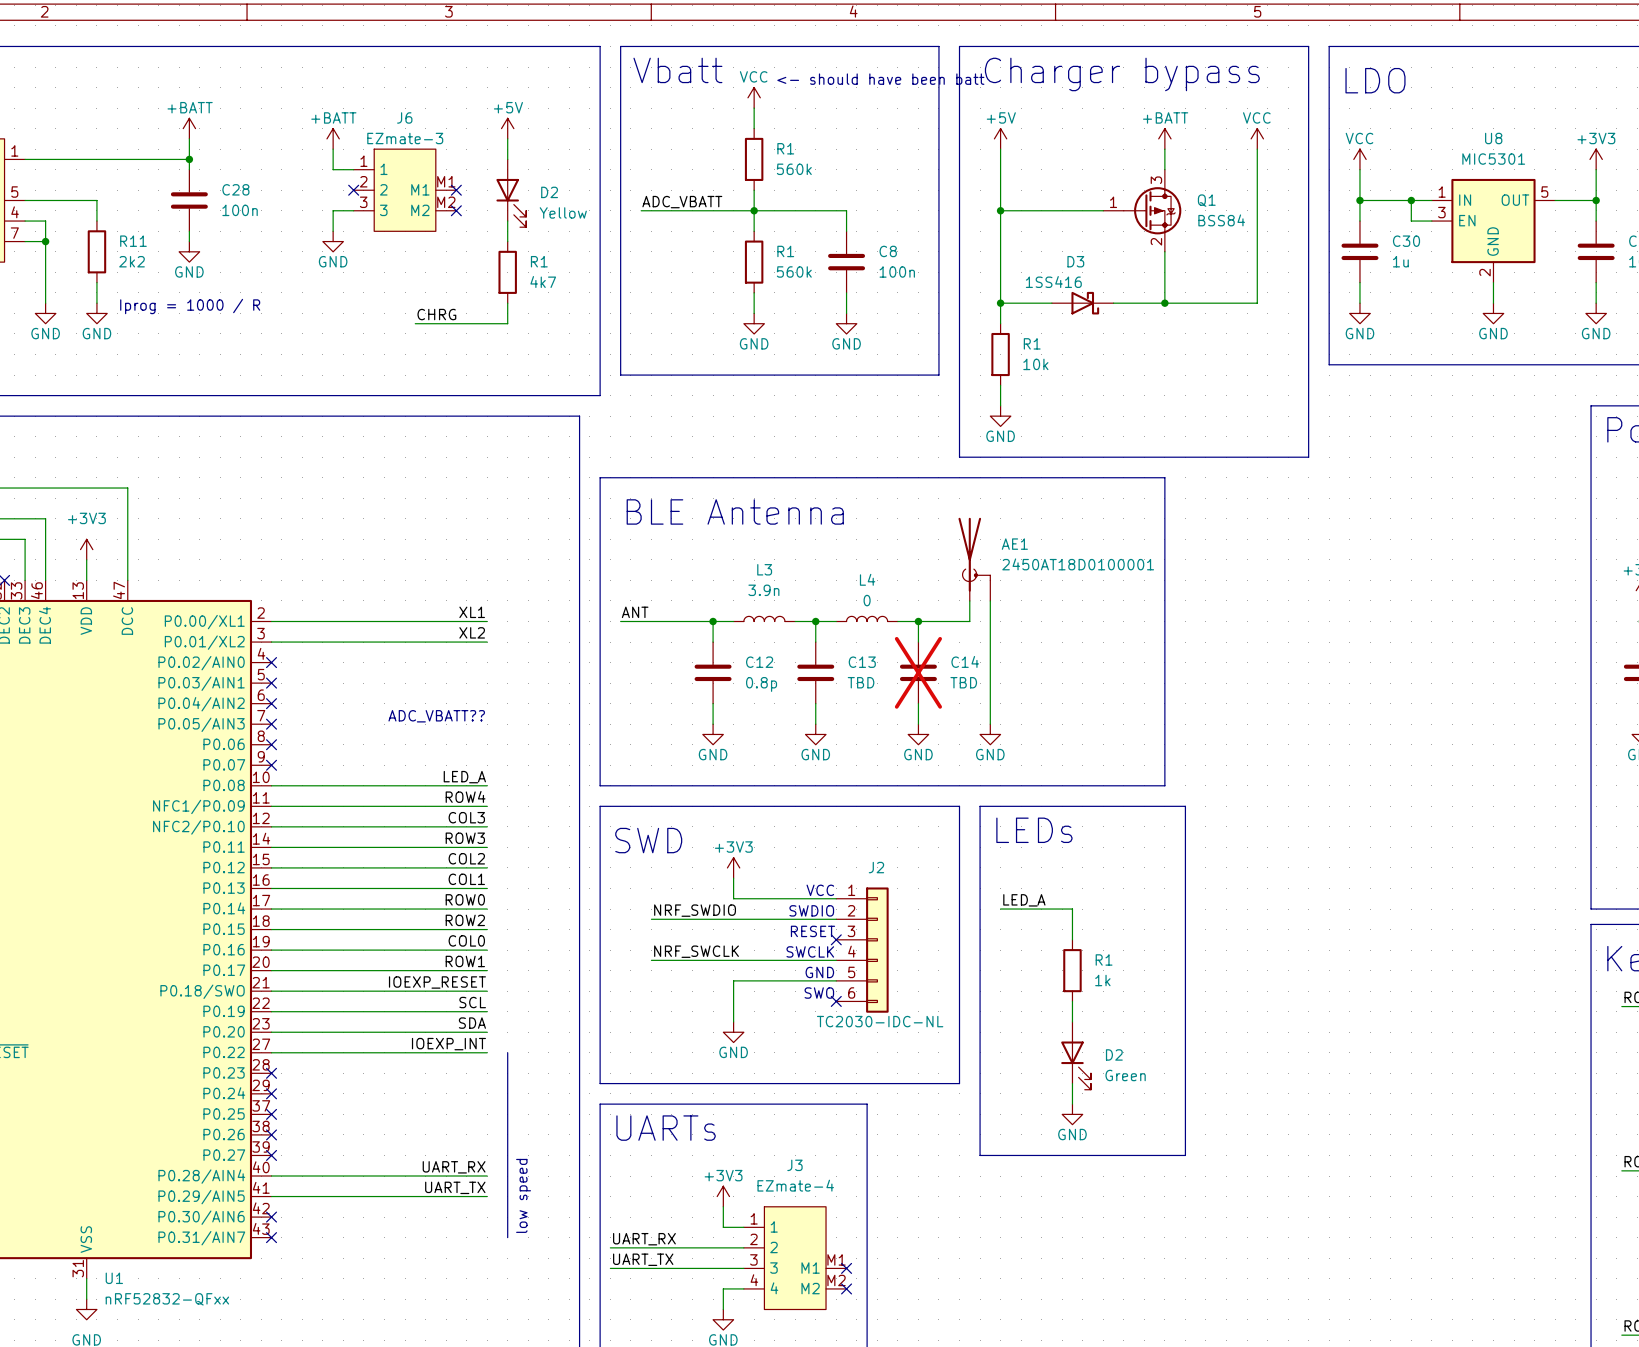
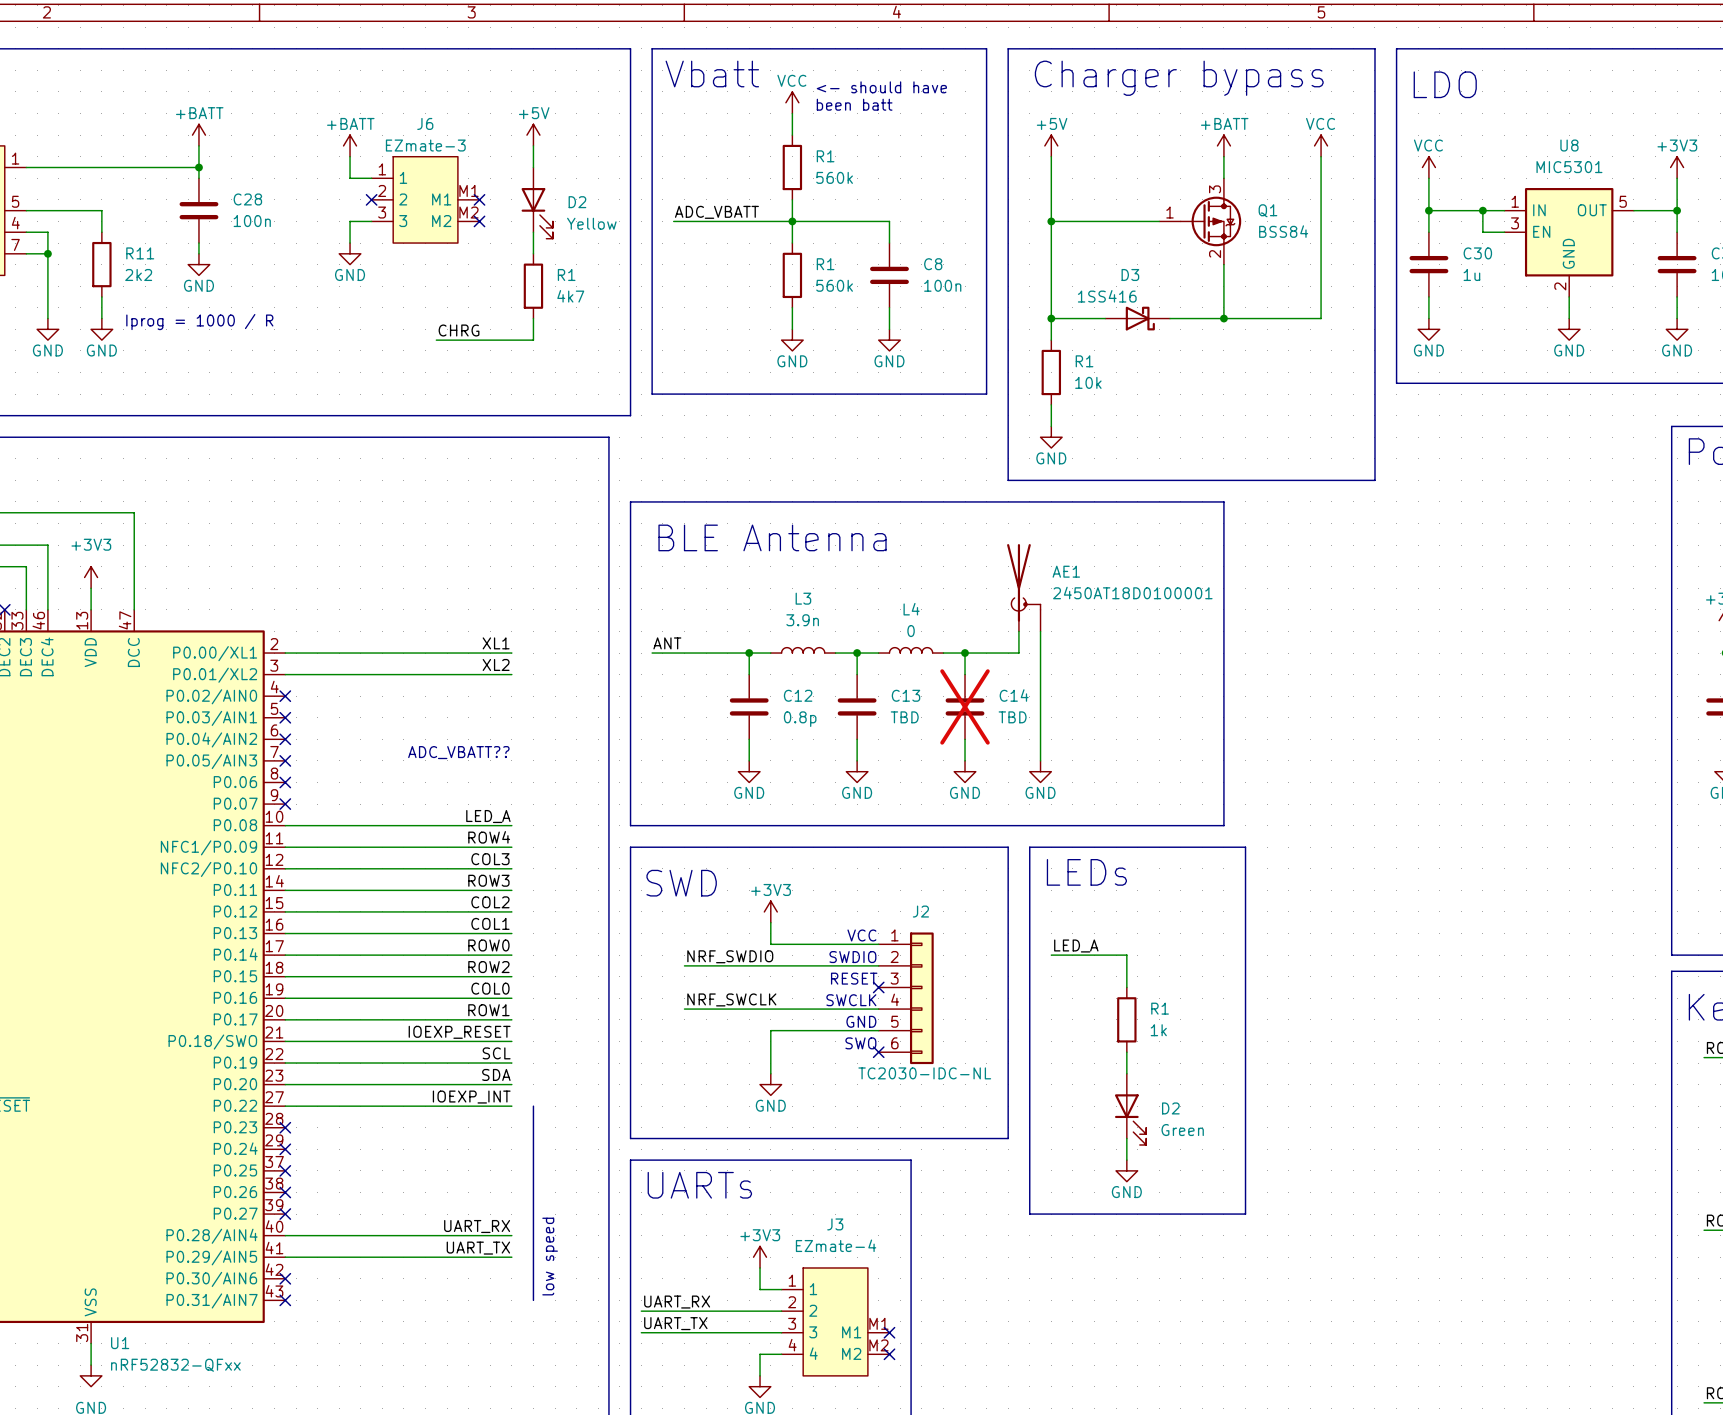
text: <- should have been batt (880, 79) -> <- should have (881, 87)
text: none -> been batt (854, 104)

